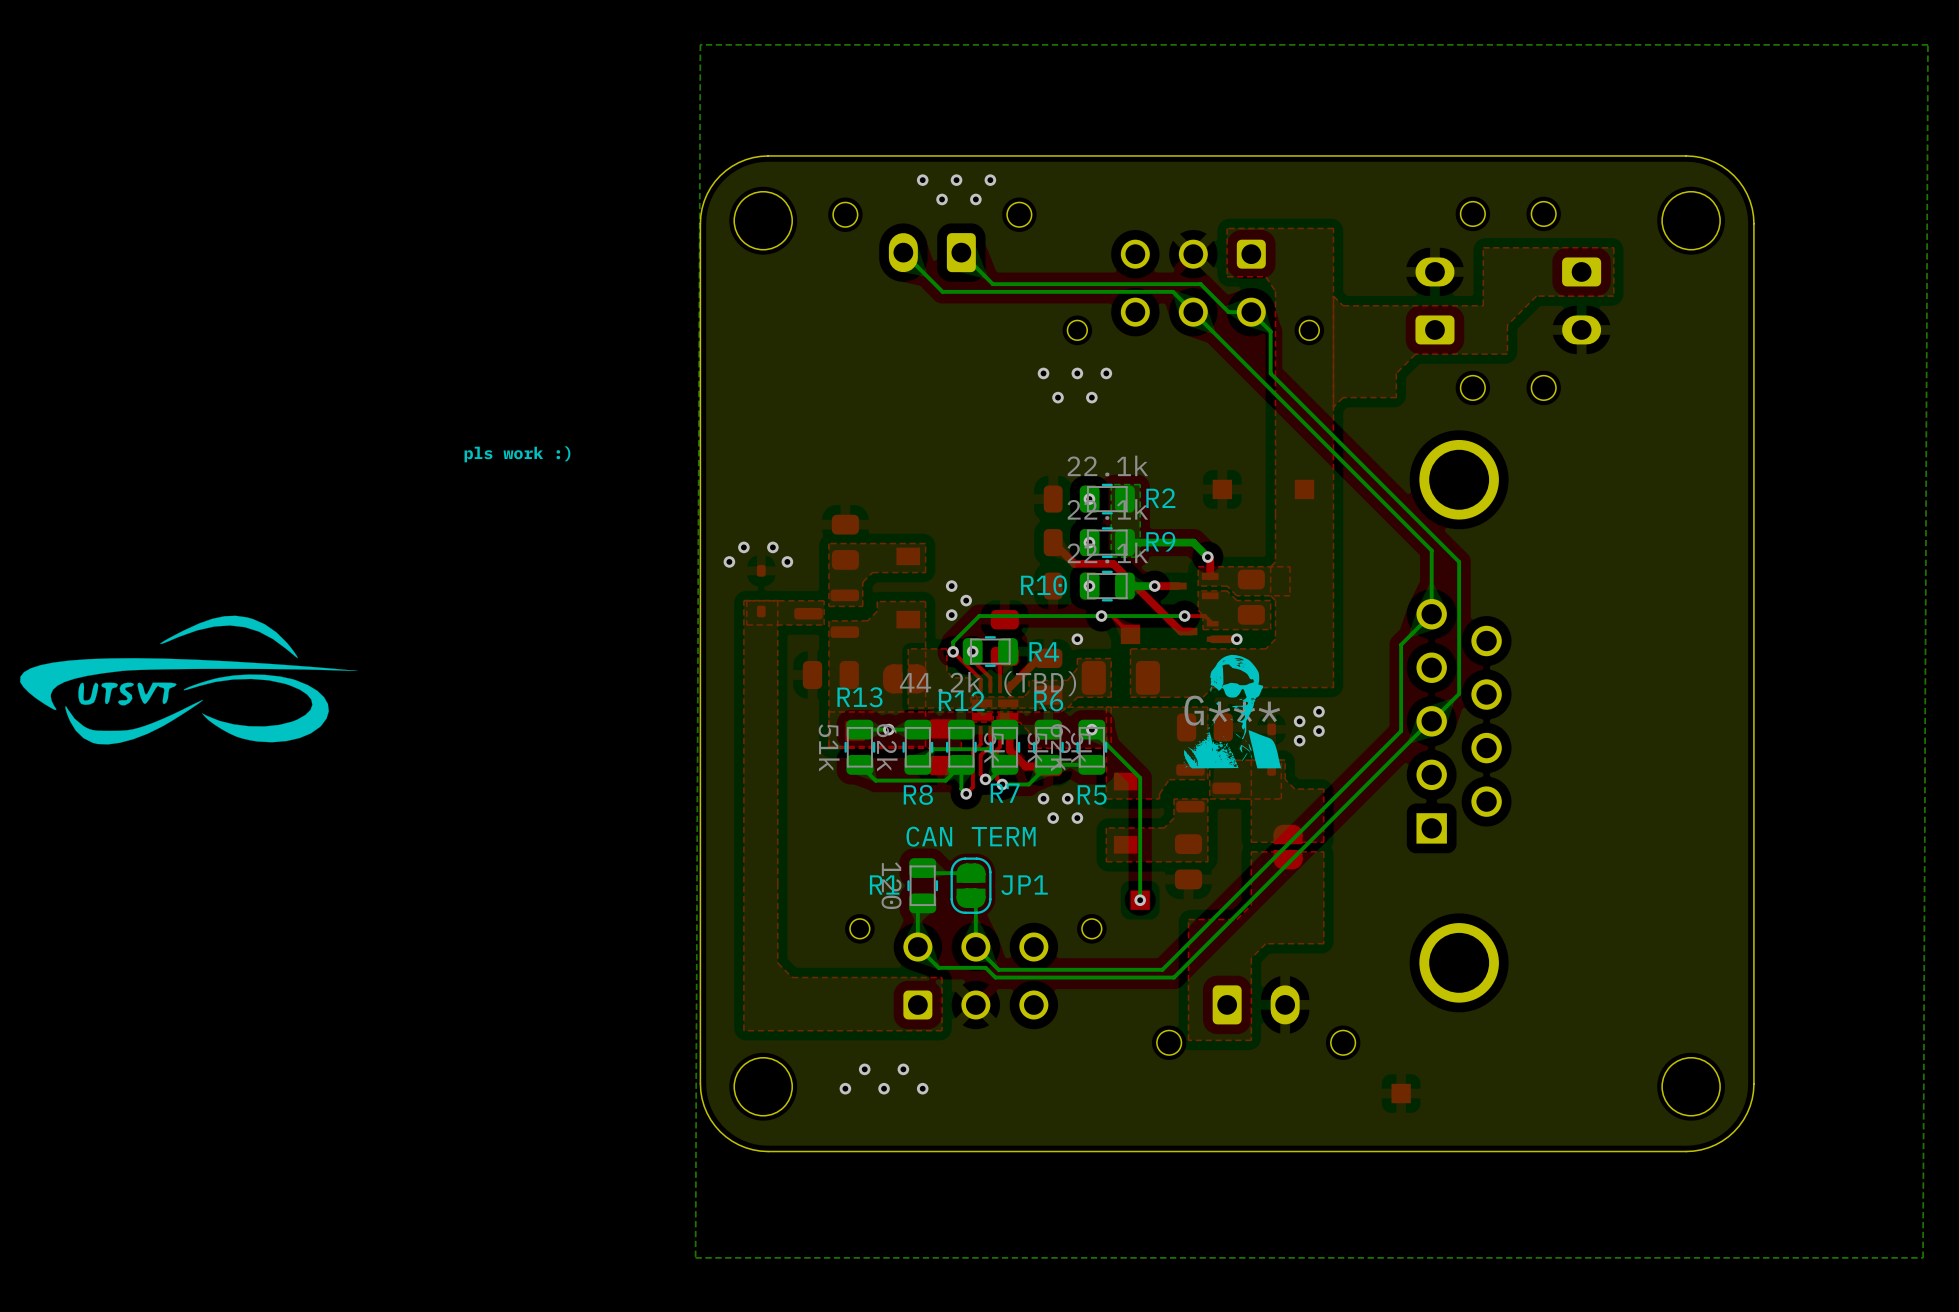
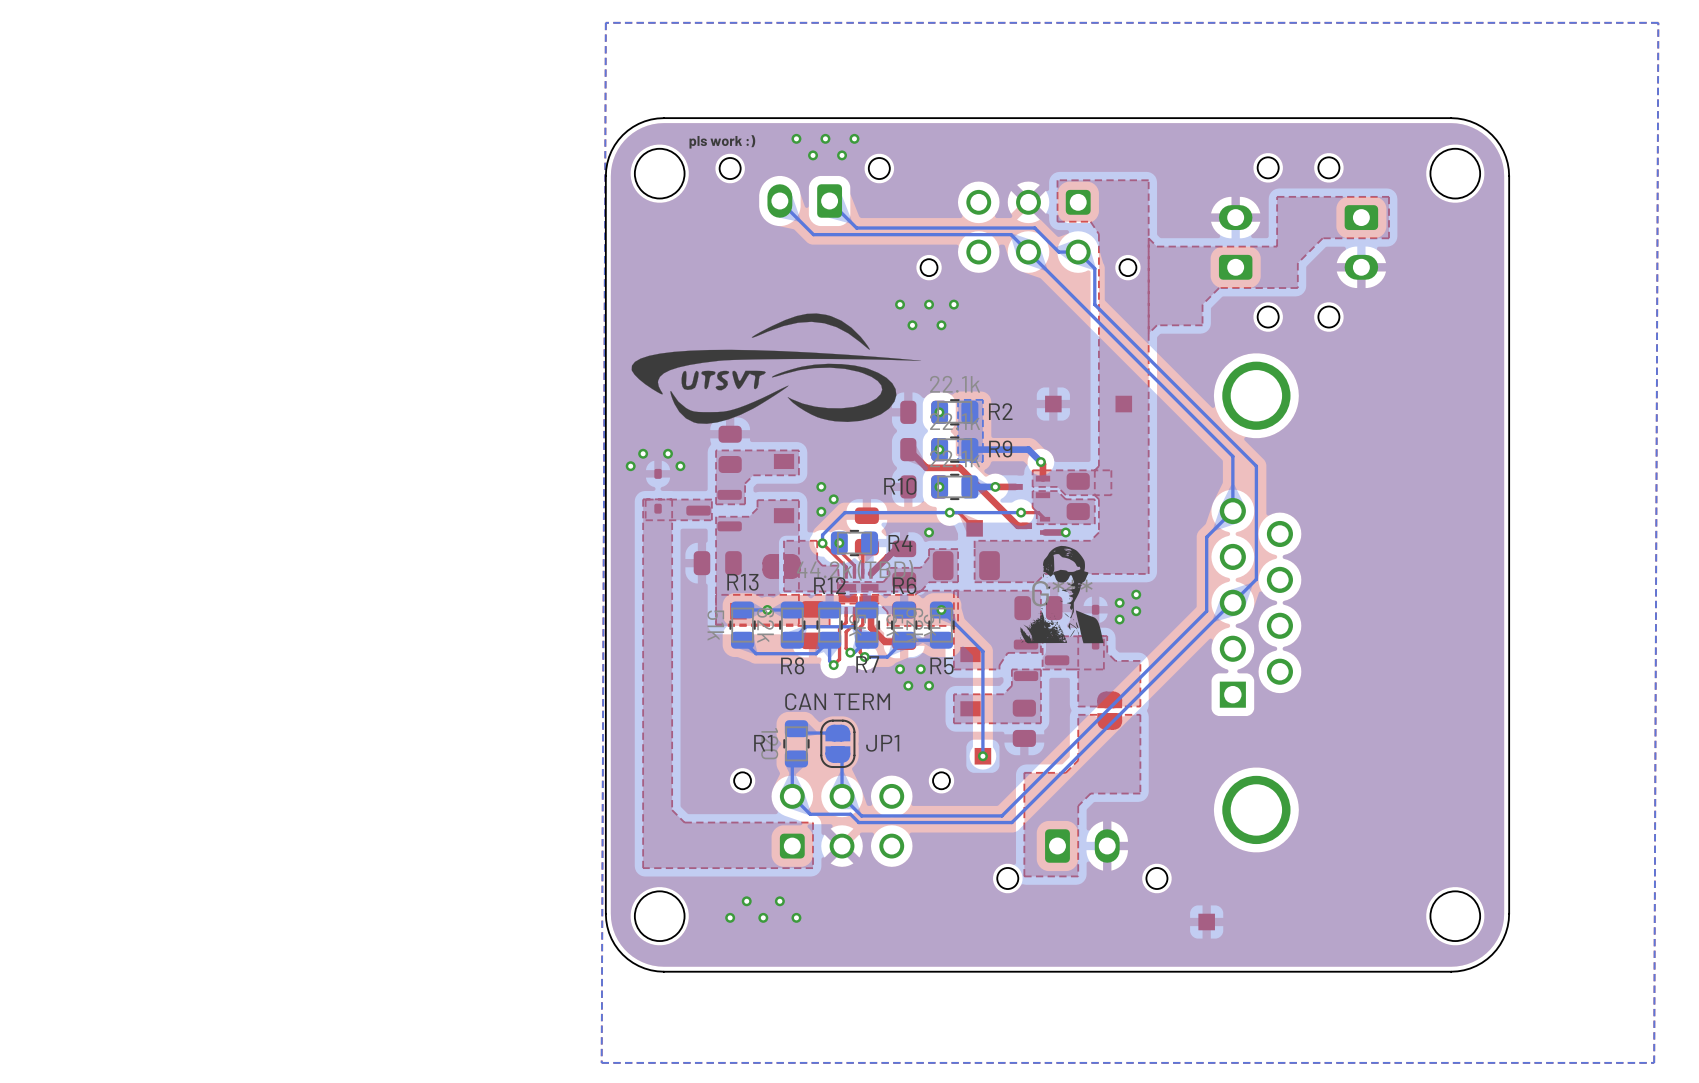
drawing: none -> [631, 313, 922, 424]
text position: pls work :) (517, 454) -> pls work :) (722, 141)
drawing: [20, 615, 358, 745] -> none

